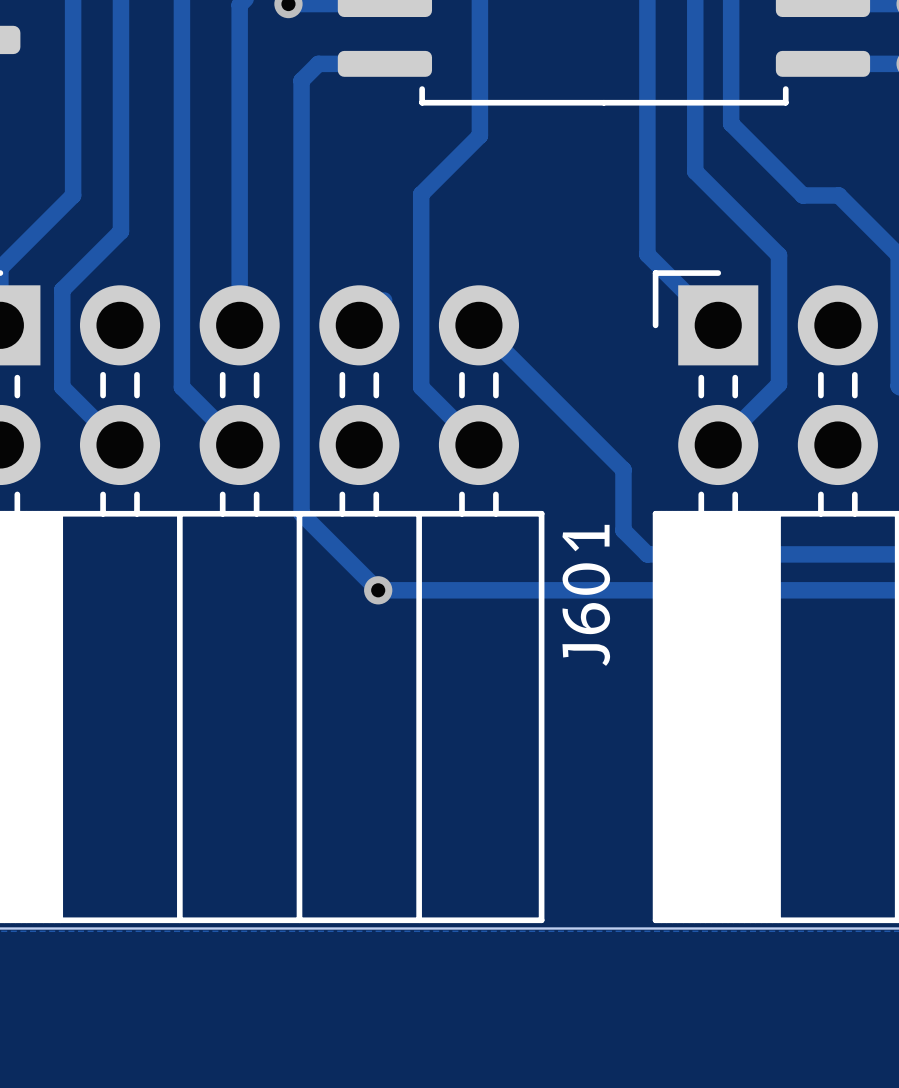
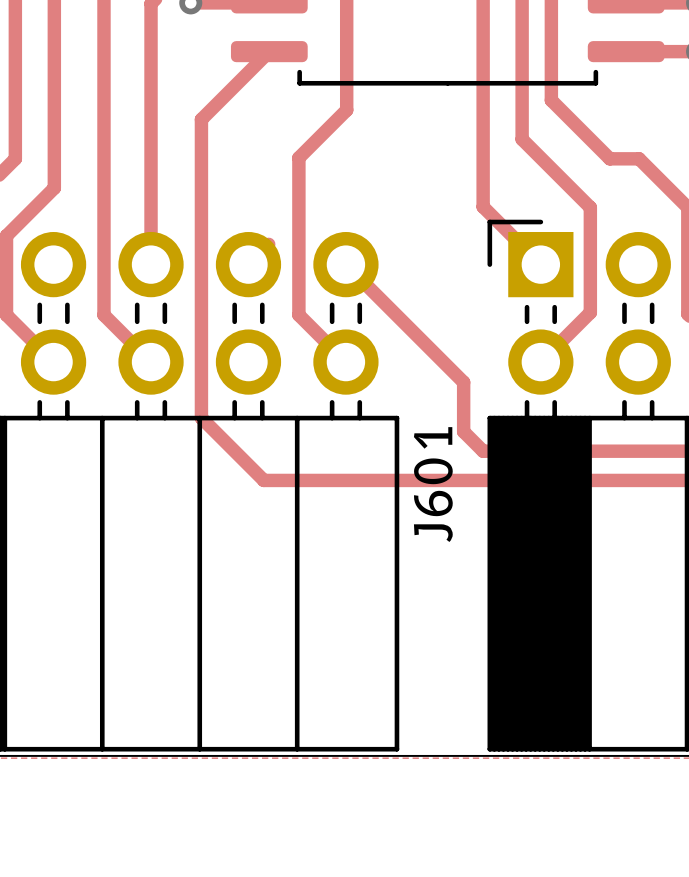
track: (384, 63) (318, 63) (301, 80) (301, 147) -> (269, 51) (201, 119)
via: (378, 590) -> none

